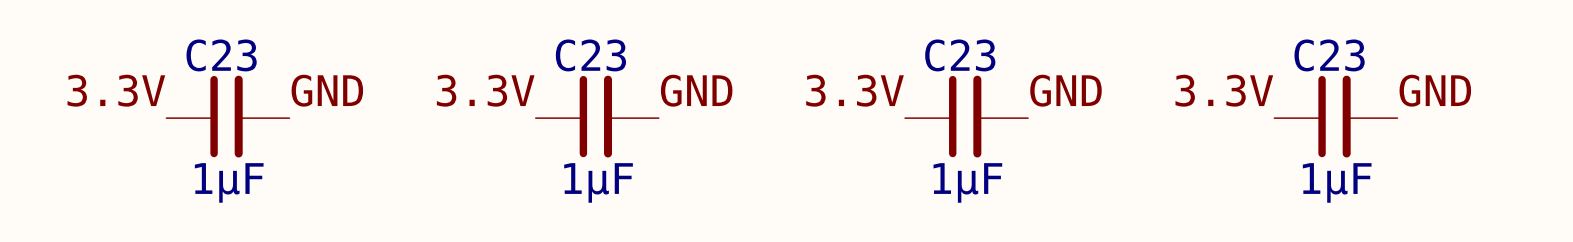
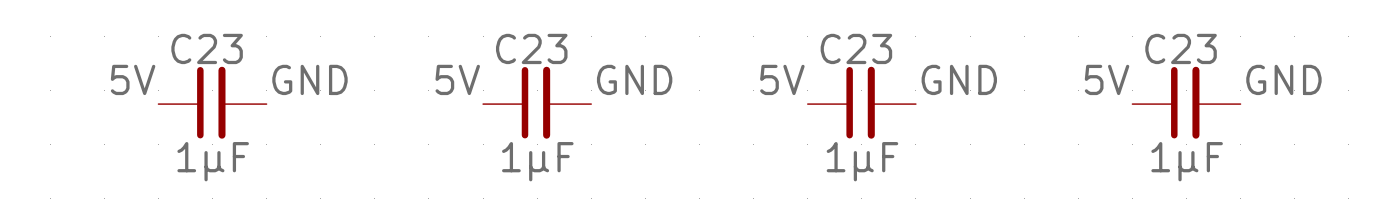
label: 3.3V (116, 90) -> 5V (133, 79)
label: 3.3V (485, 90) -> 5V (457, 79)
label: 3.3V (855, 90) -> 5V (782, 79)
label: 3.3V (1224, 90) -> 5V (1107, 79)

